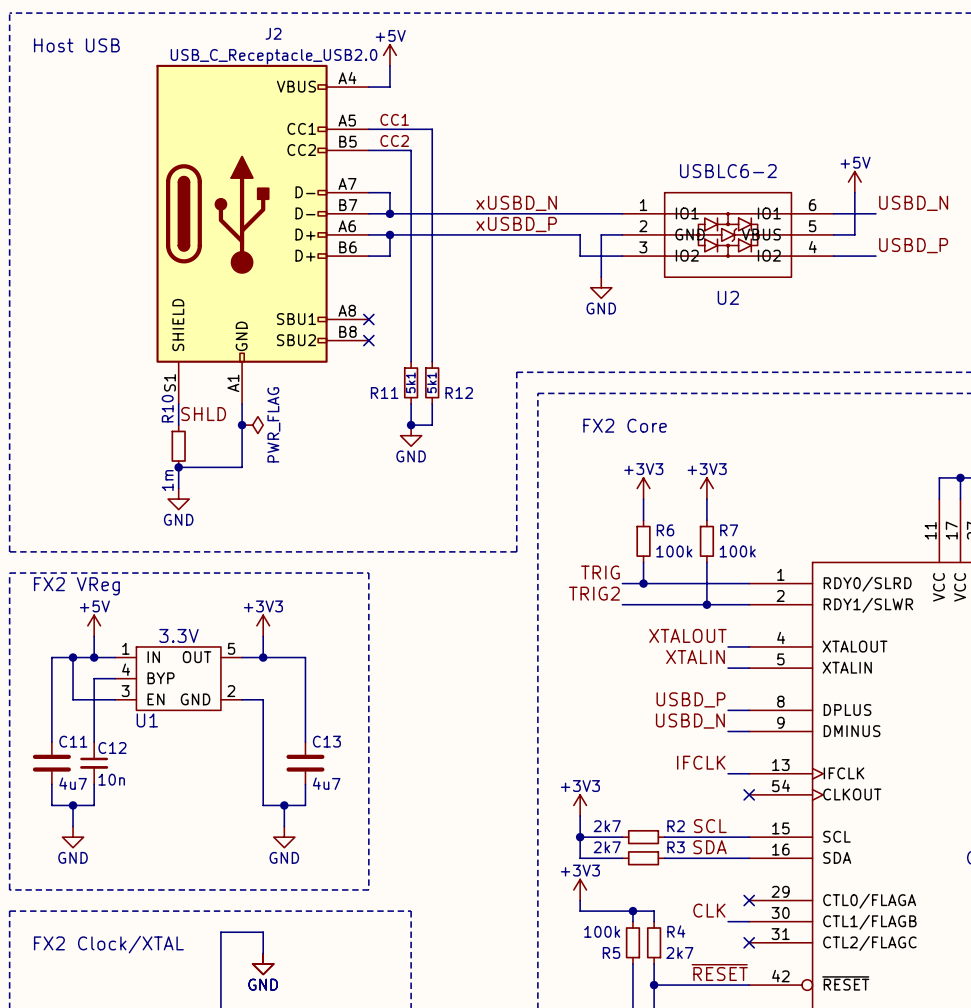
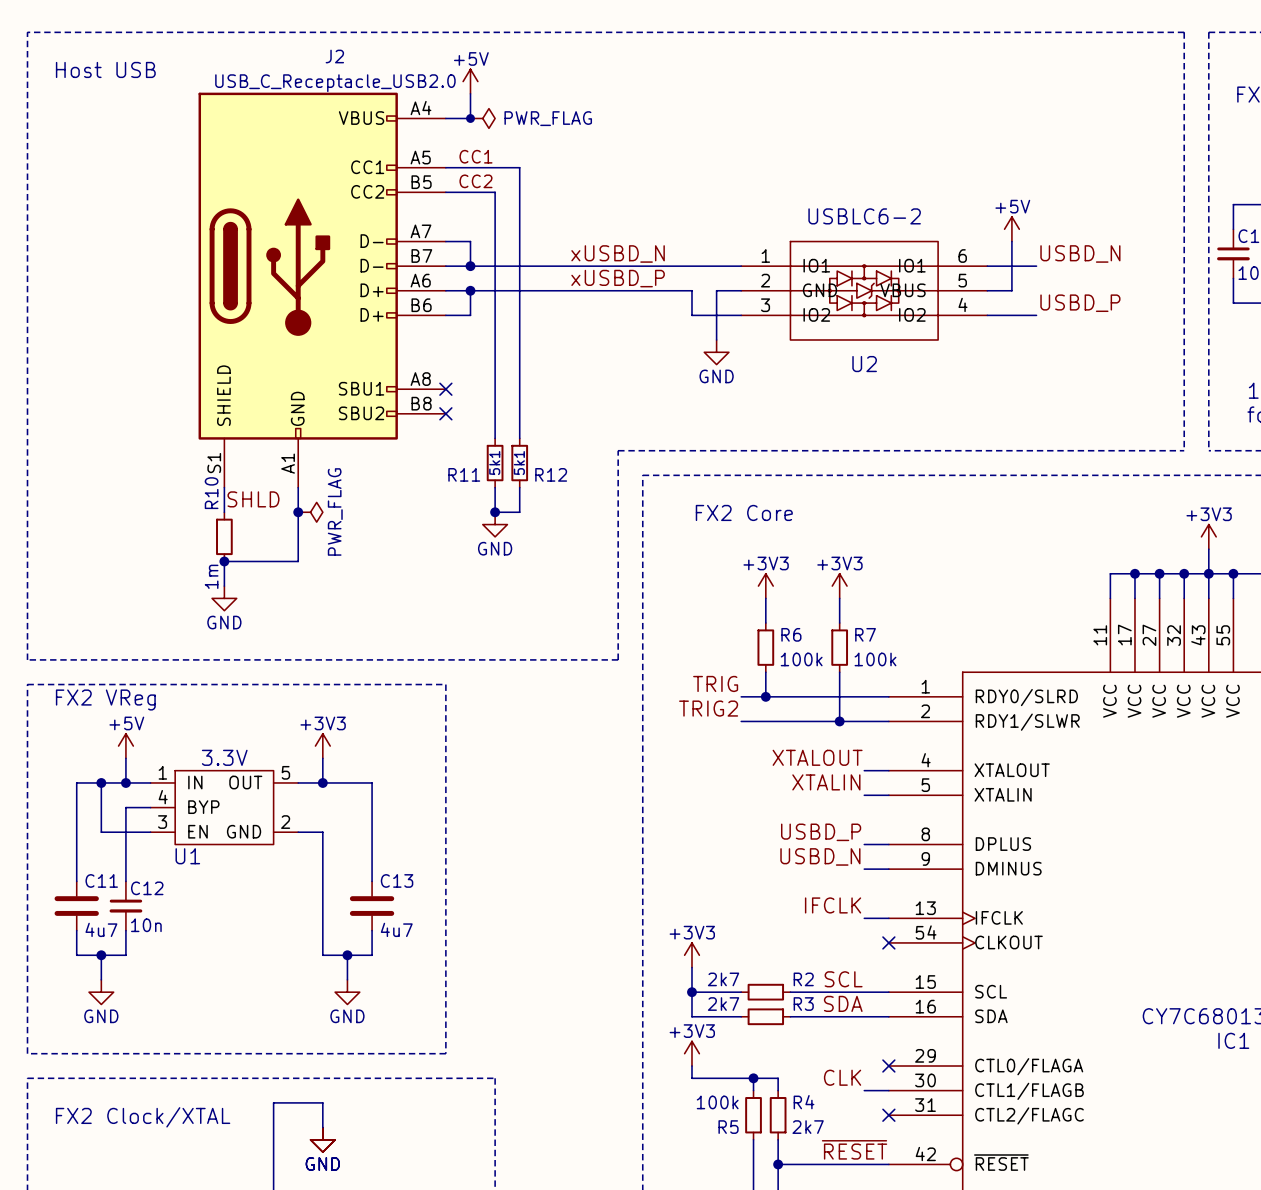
junction: none -> (470, 118)
power symbol: none -> PWR_FLAG (482, 118)

